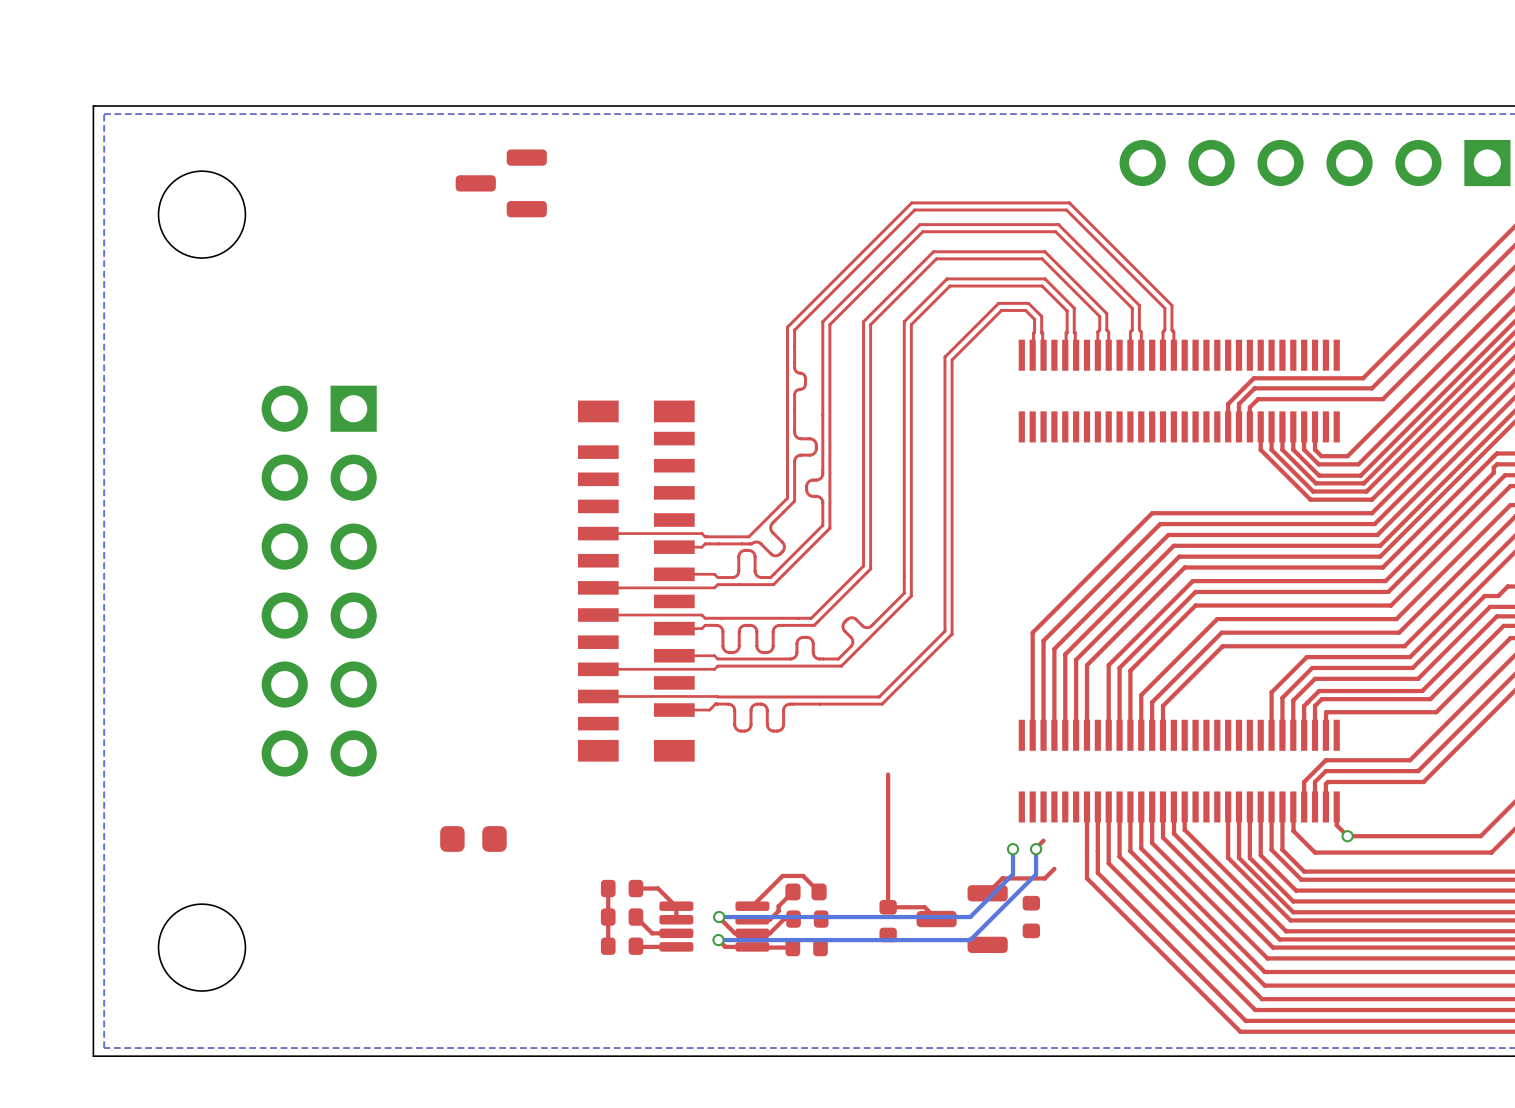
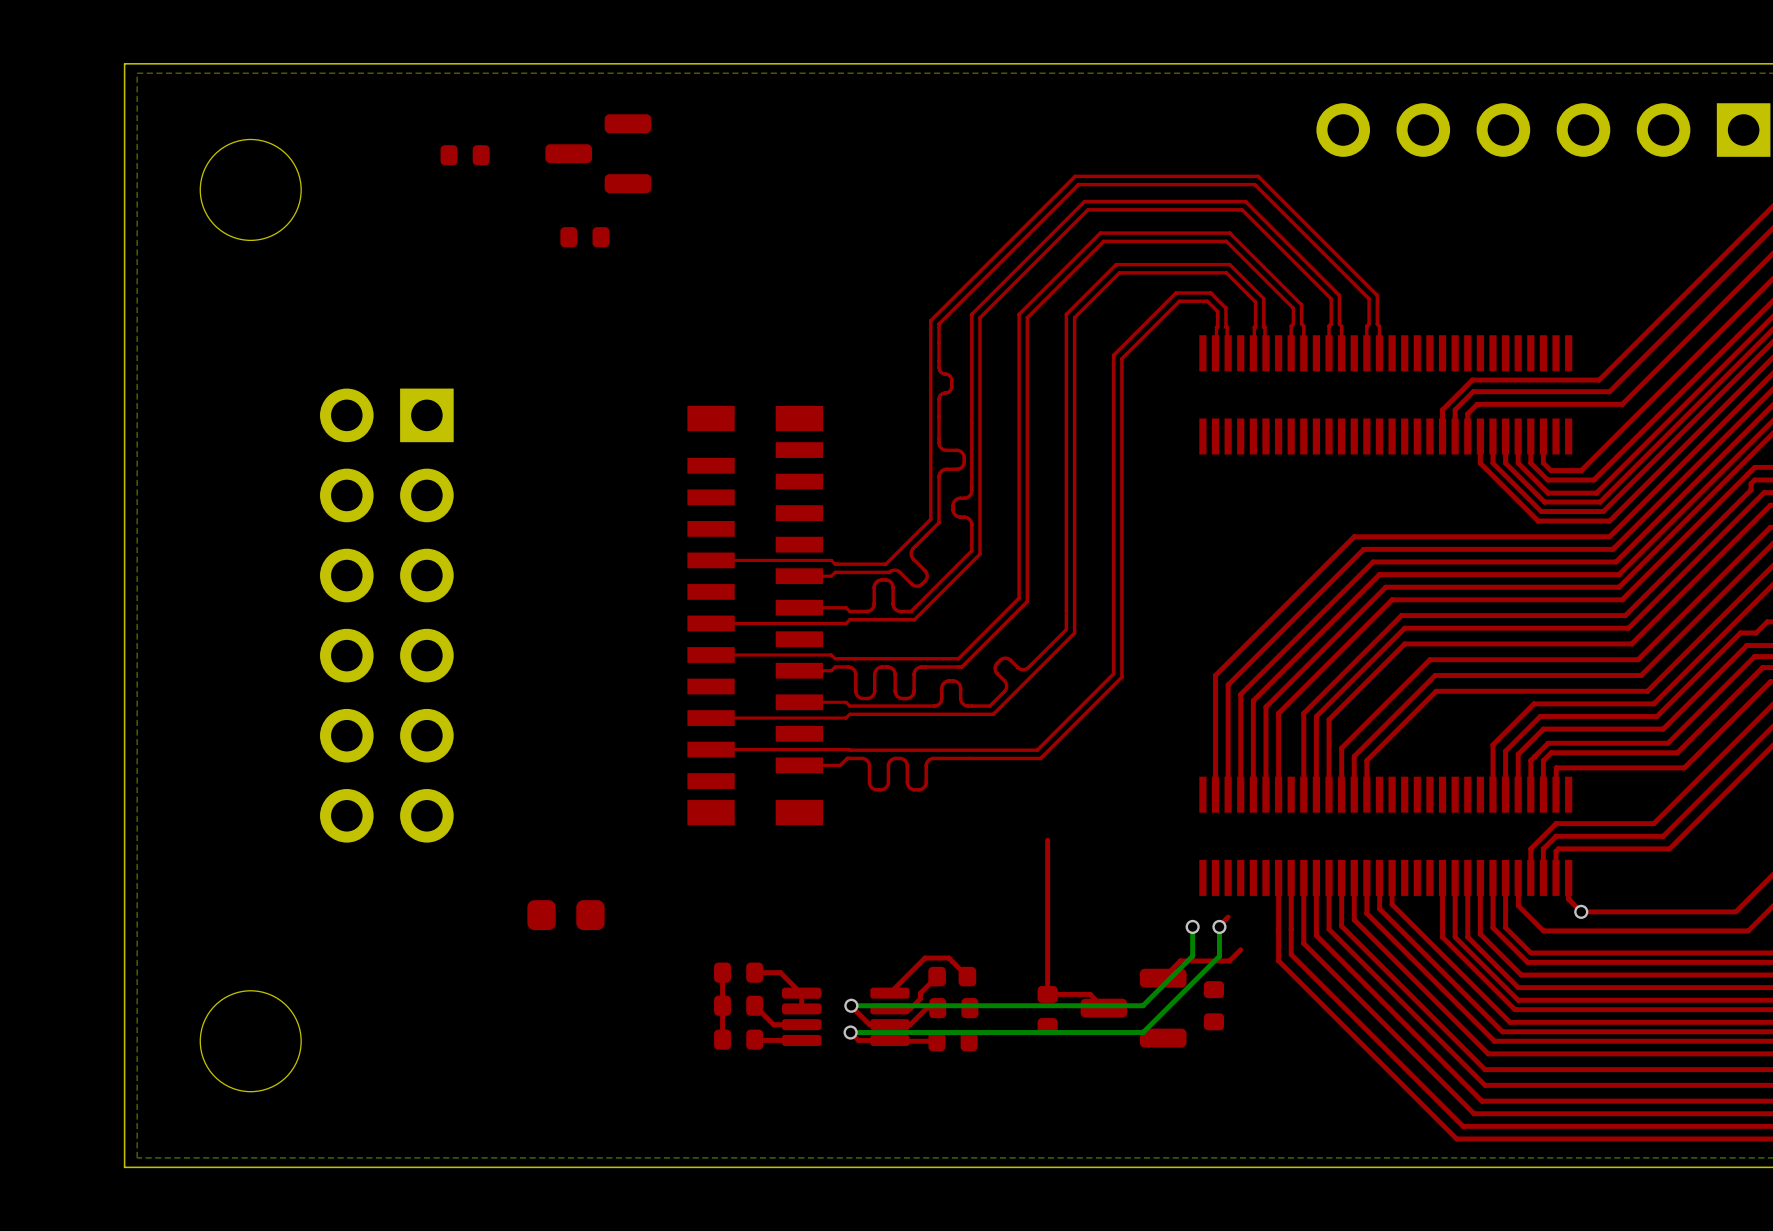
part: none -> (465, 155)
part: none -> (584, 237)

